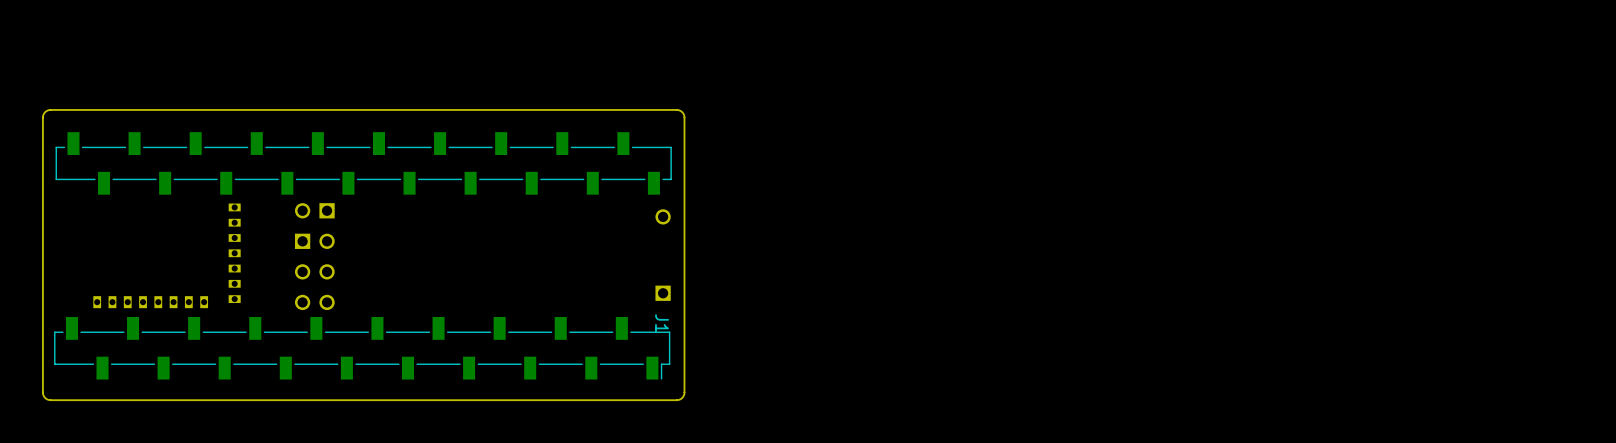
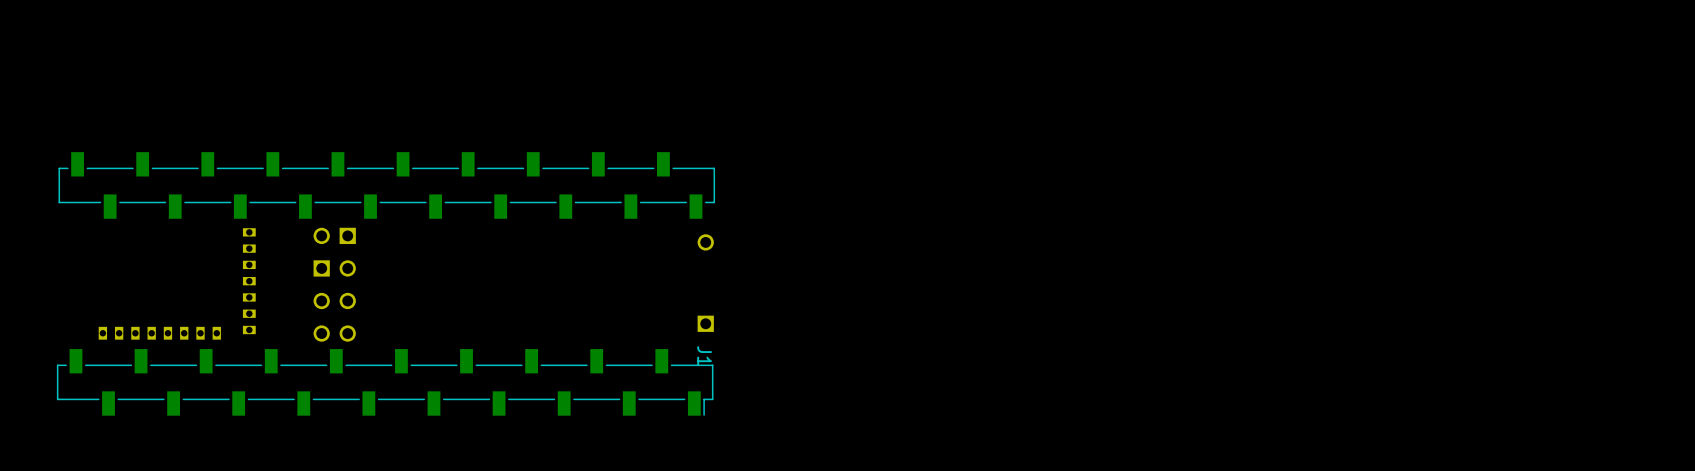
board edge: (676, 109) (47, 110) (42, 117) (43, 395) (50, 400) (679, 399) (684, 392) (684, 117) (682, 112) (676, 109) -> none

